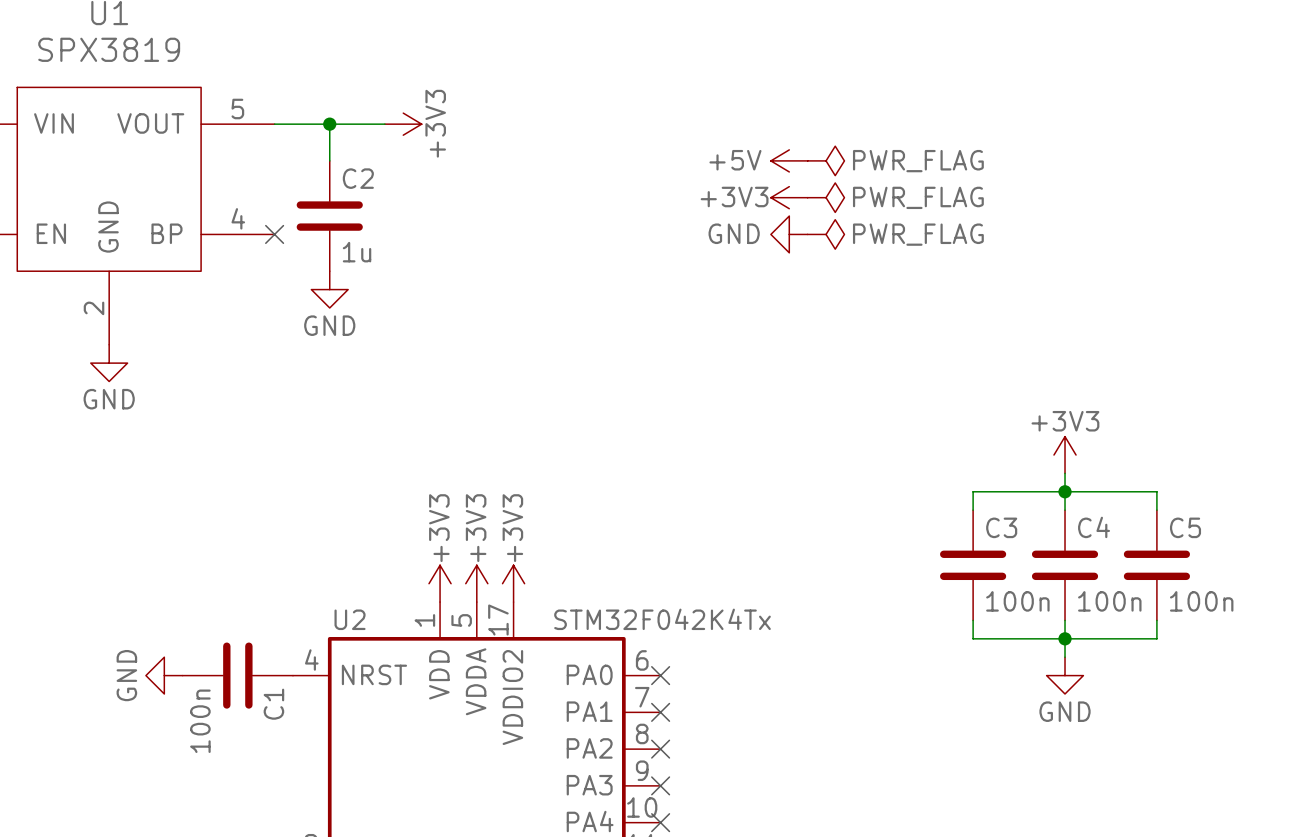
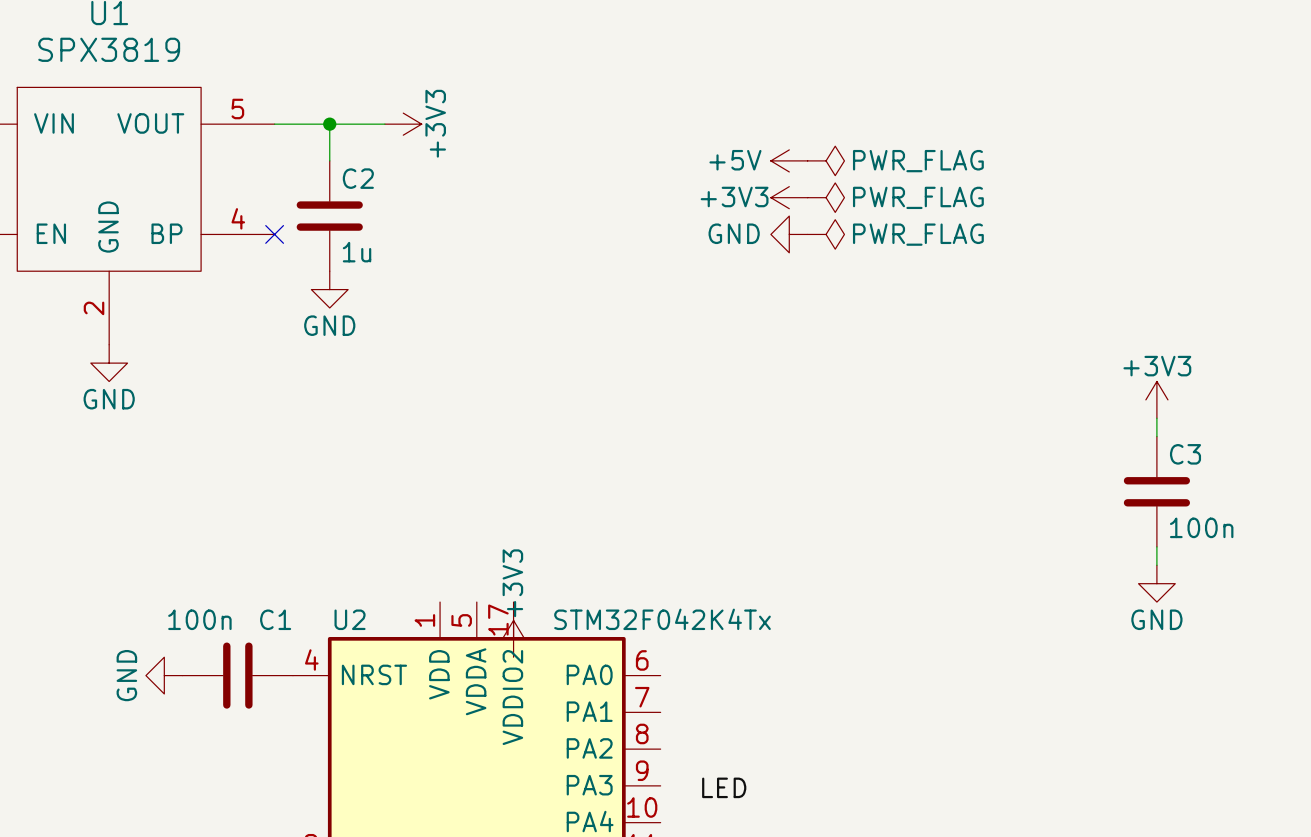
wire: none -> (1156, 418) (1156, 436)
power symbol position: +3V3 (1065, 455) -> +3V3 (1156, 399)
wire: (1065, 473) (1065, 510) -> none
junction: (1065, 491) -> none
wire: (973, 510) (973, 491) (1156, 491) (1156, 510) -> none
C3 position: (973, 565) -> (1156, 491)
C4: 100n (1065, 565) -> none
C5: 100n (1156, 565) -> none
power symbol: +3V3 (440, 583) -> none
power symbol: +3V3 (476, 583) -> none
power symbol: +3V3 (513, 583) -> none
wire: (973, 620) (973, 638) (1156, 638) (1156, 620) -> none
wire: (1065, 620) (1065, 657) -> none
power symbol: none -> +3V3 (513, 638)
junction: (1065, 638) -> none
no-connect mark: (660, 675) -> none
power symbol position: GND (1065, 675) -> GND (1156, 583)
C1 name rotation: 0° (273, 704) -> 90° clockwise (275, 619)
C1 name position: C1 (273, 704) -> C1 (275, 619)
no-connect mark: (660, 712) -> none
C1 value rotation: 0° (200, 721) -> 90° clockwise (199, 619)
C1 value position: 100n (200, 721) -> 100n (199, 619)
no-connect mark: (660, 749) -> none
no-connect mark: (660, 785) -> none
label: none -> LED (724, 787)
no-connect mark: (660, 822) -> none

